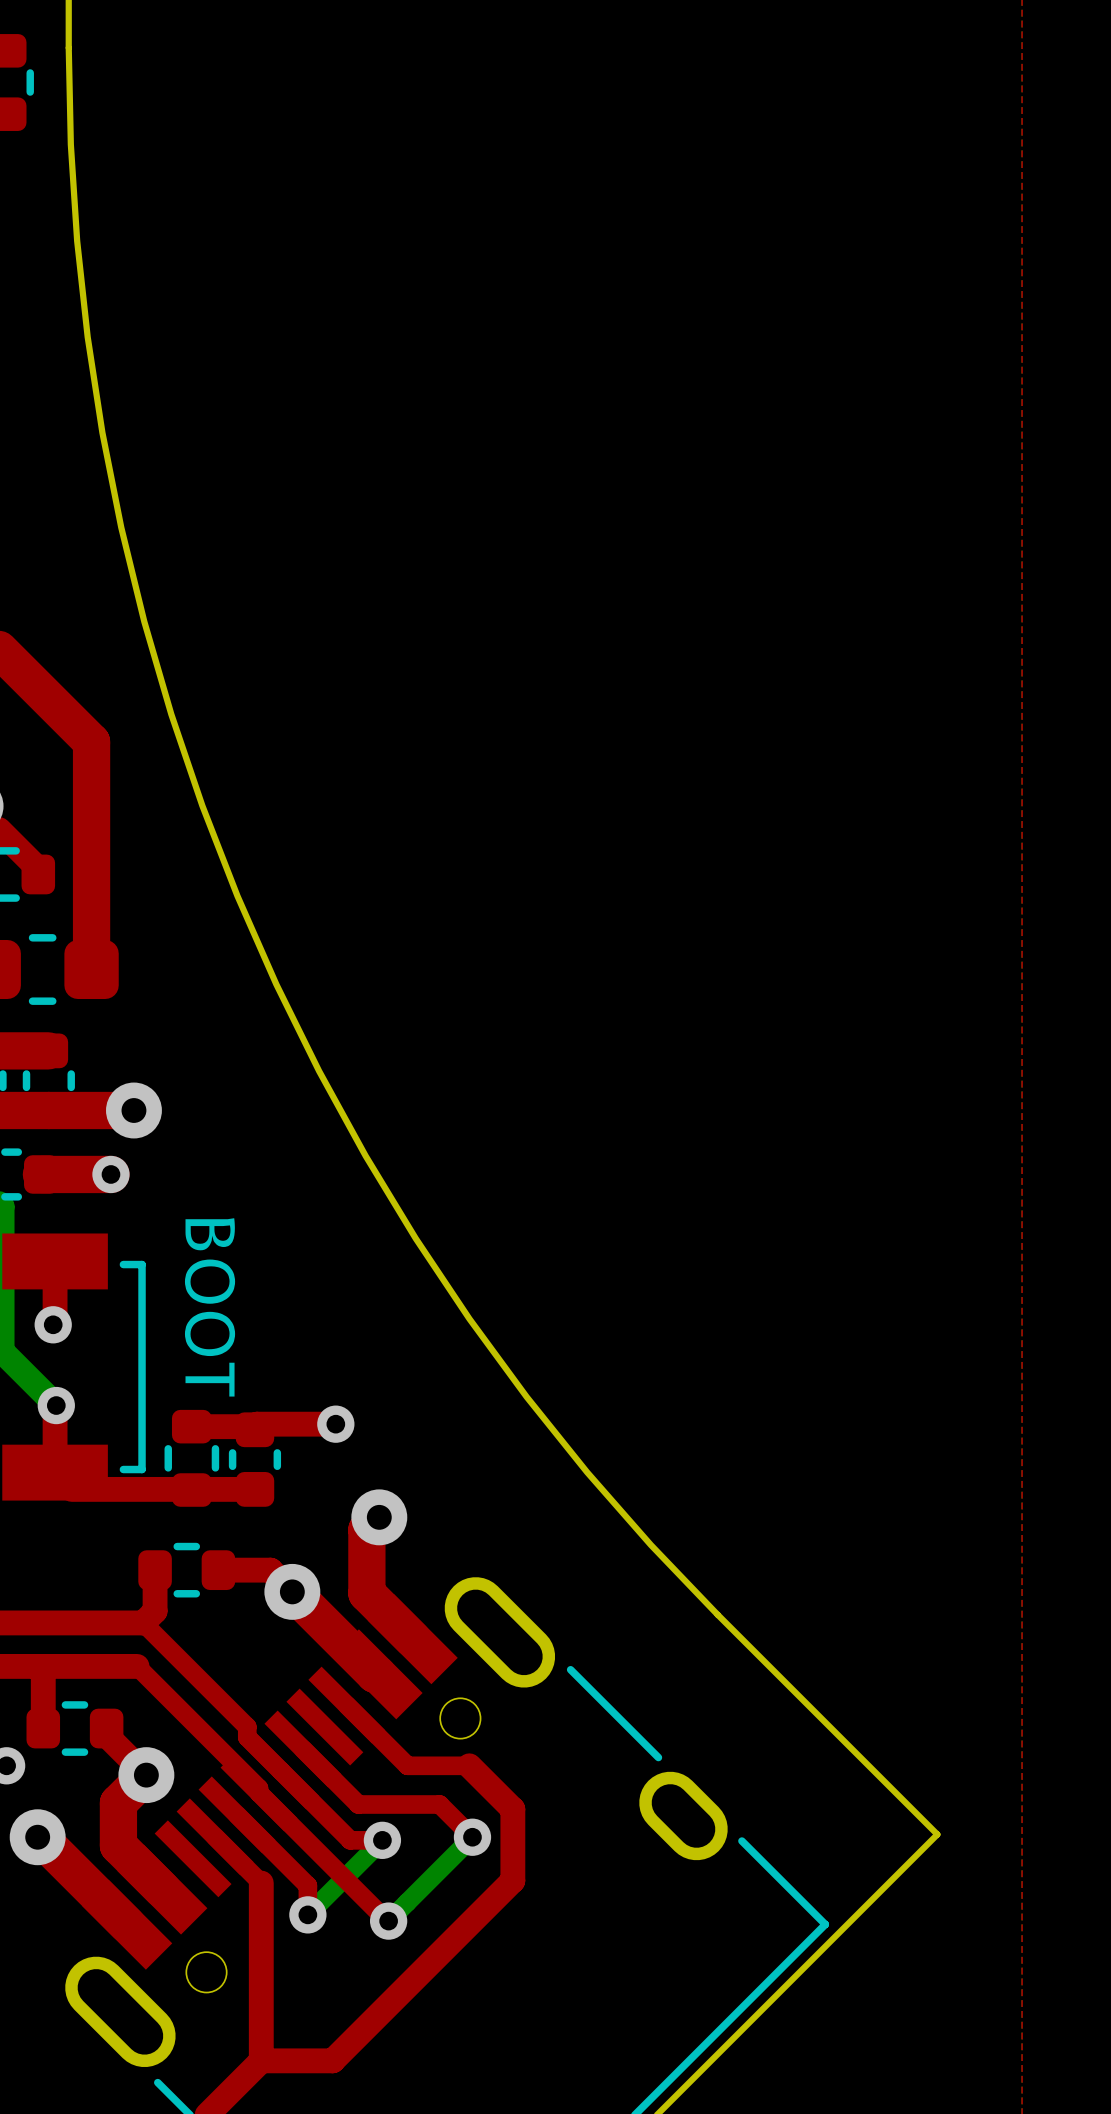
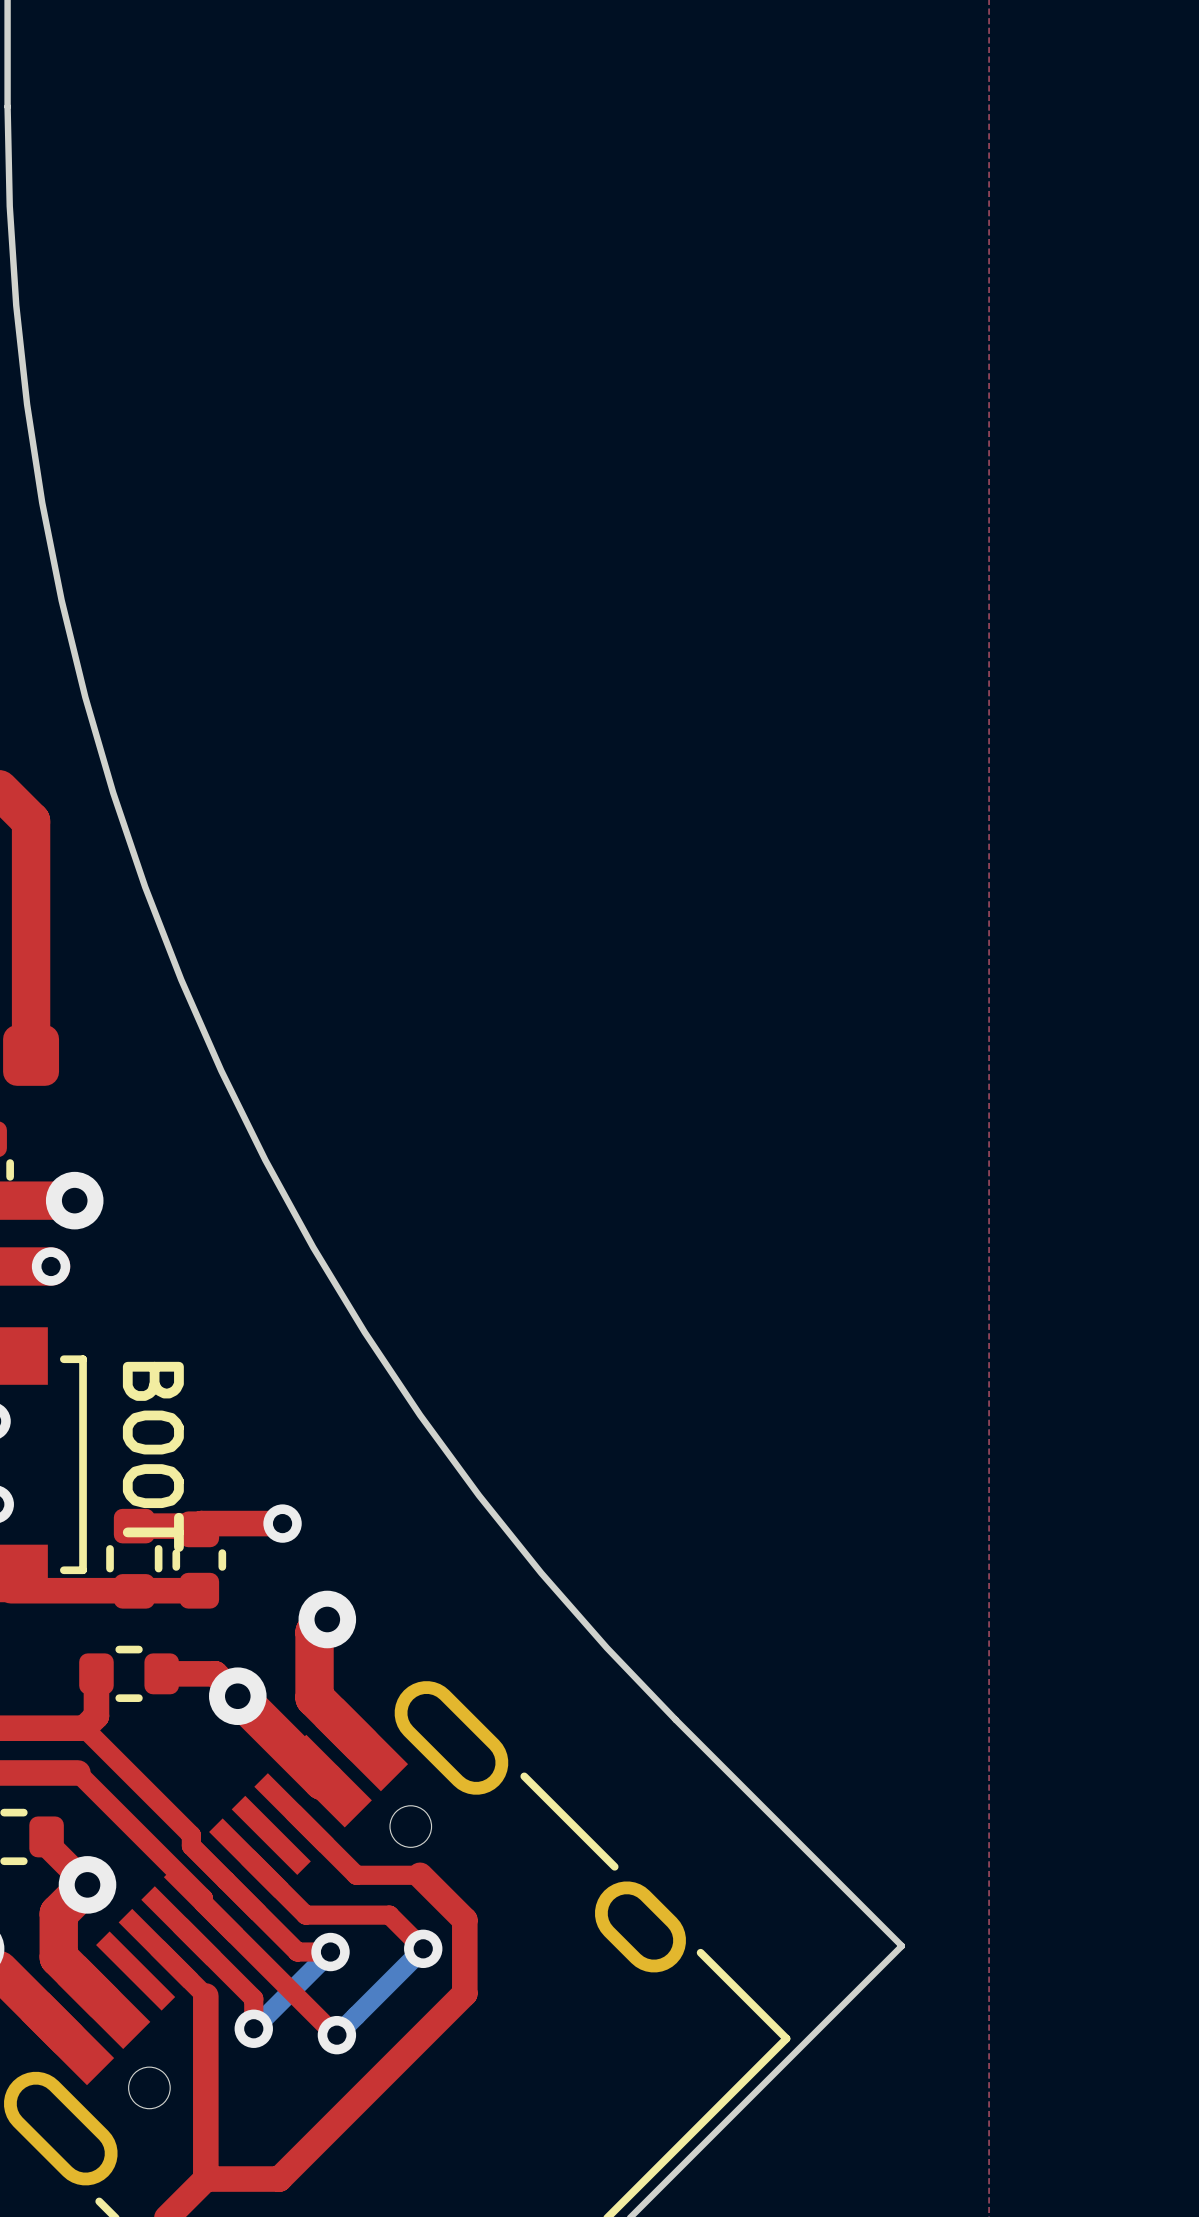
text position: BOOT (210, 1307) -> BOOT (153, 1456)

